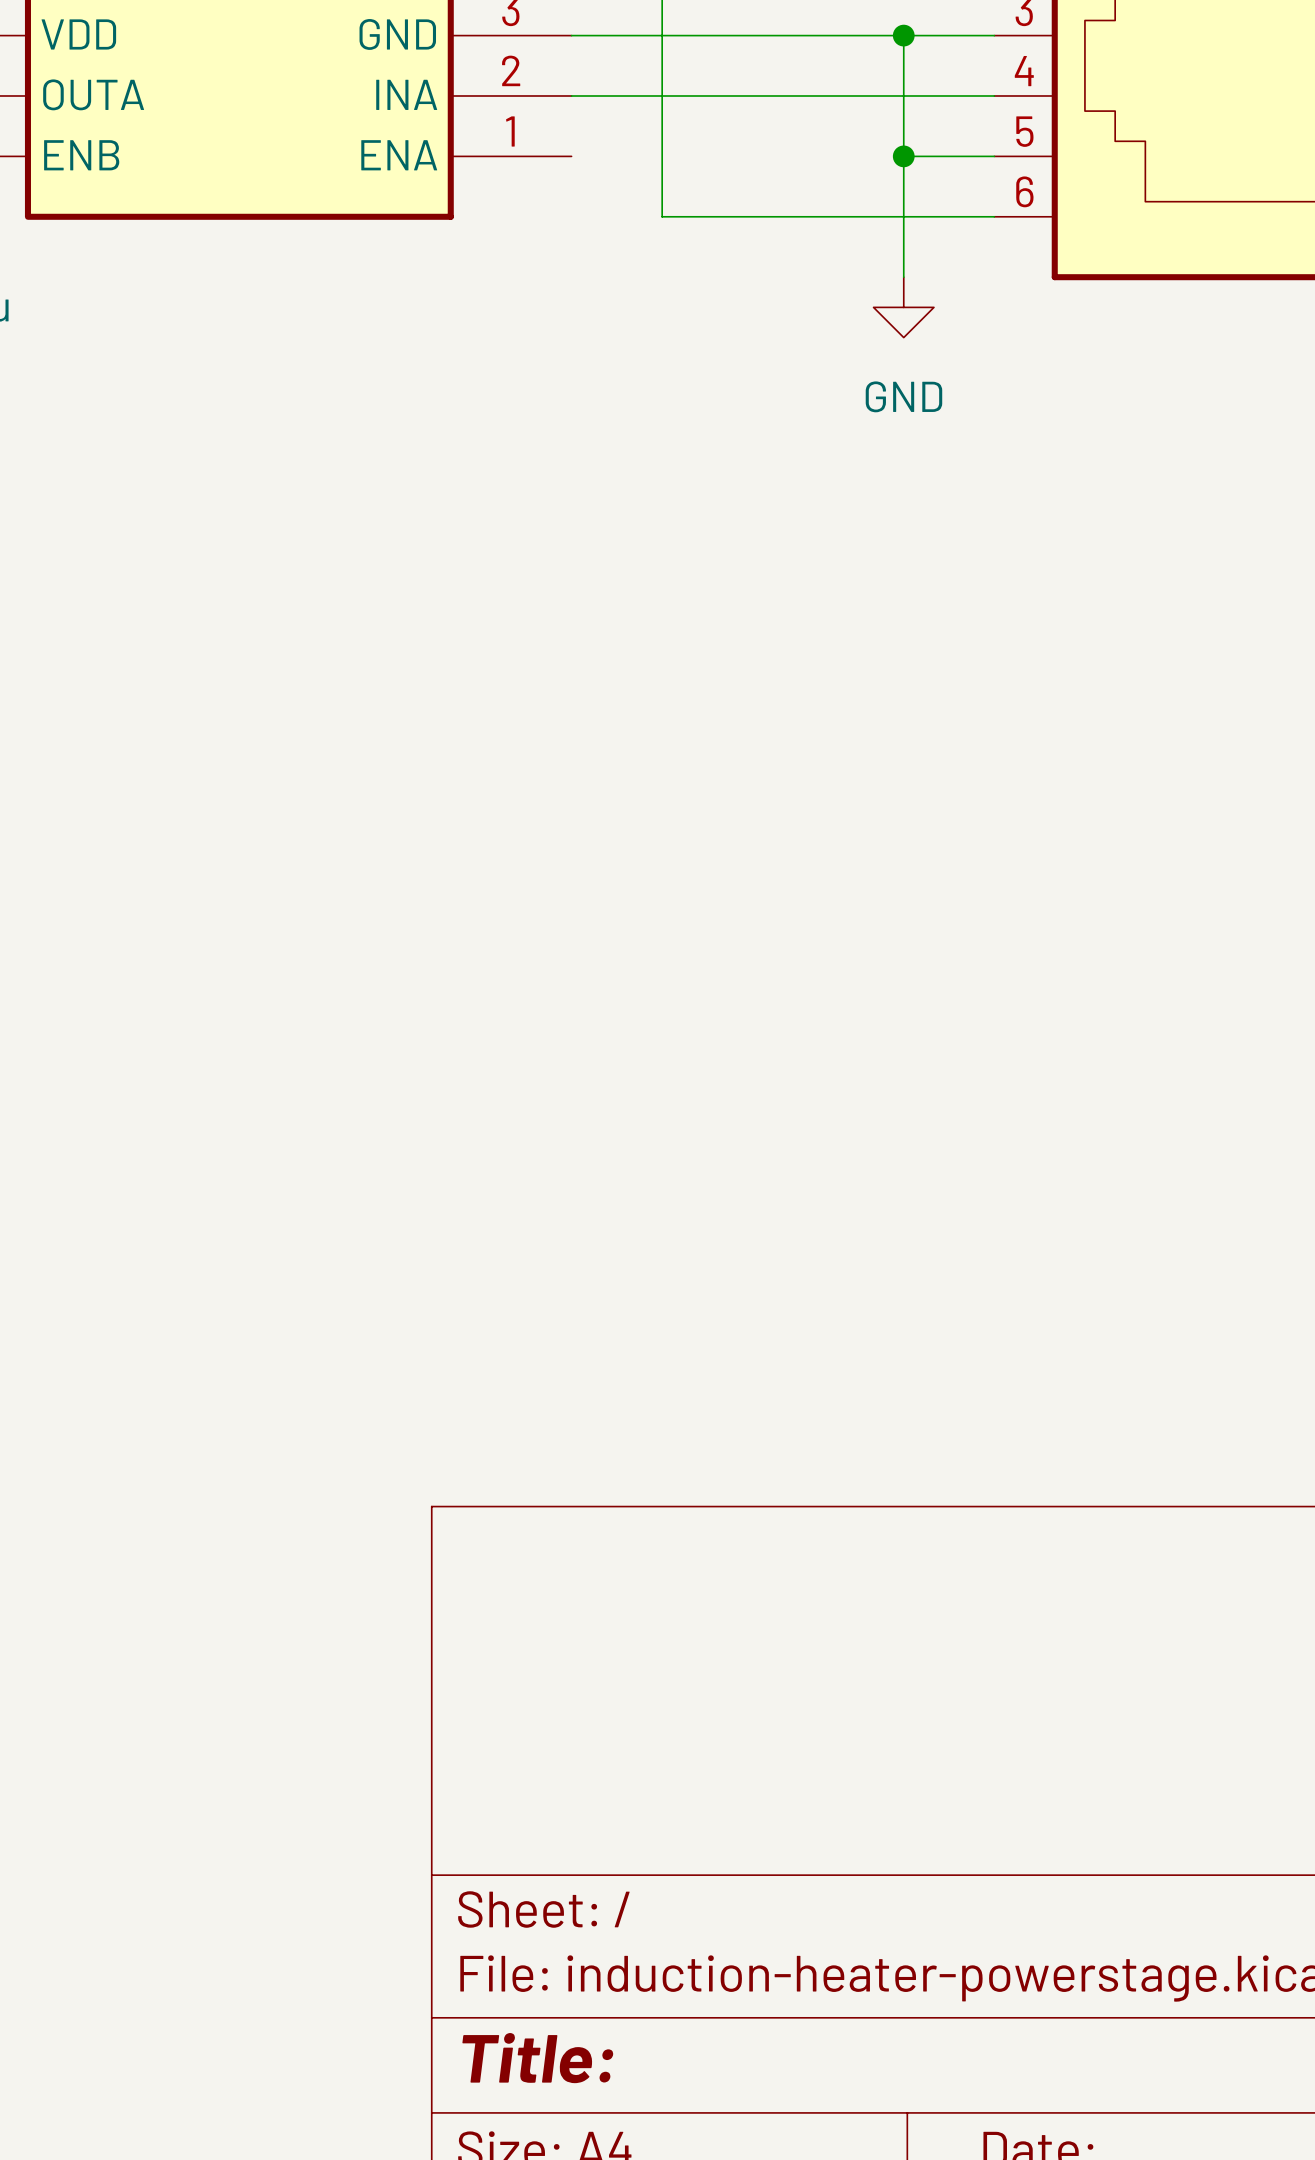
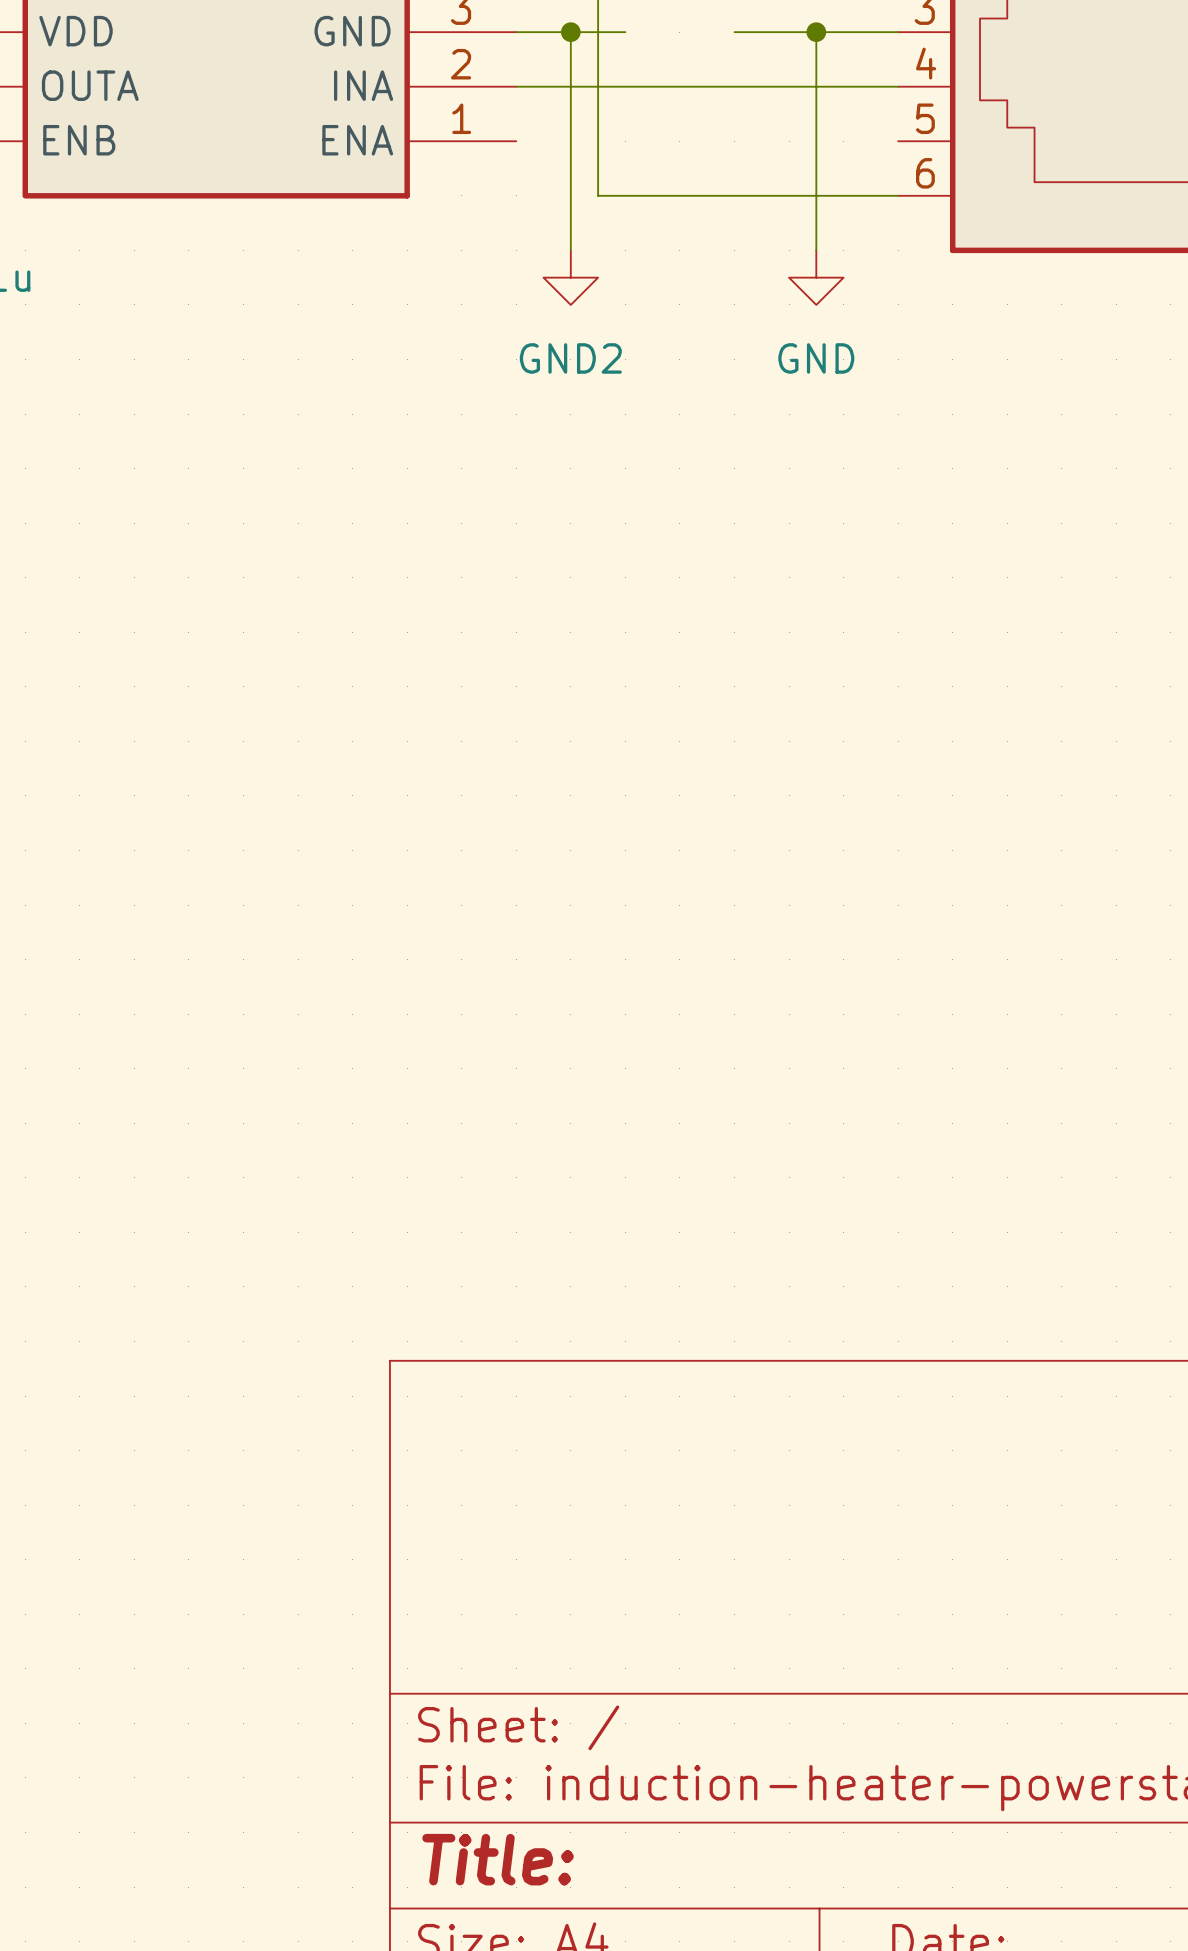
wire: none -> (570, 32) (570, 250)
junction: none -> (570, 32)
wire: (692, 35) (813, 35) -> none
wire: (903, 156) (994, 156) -> none
junction: (903, 156) -> none
power symbol: none -> GND2 (570, 277)

